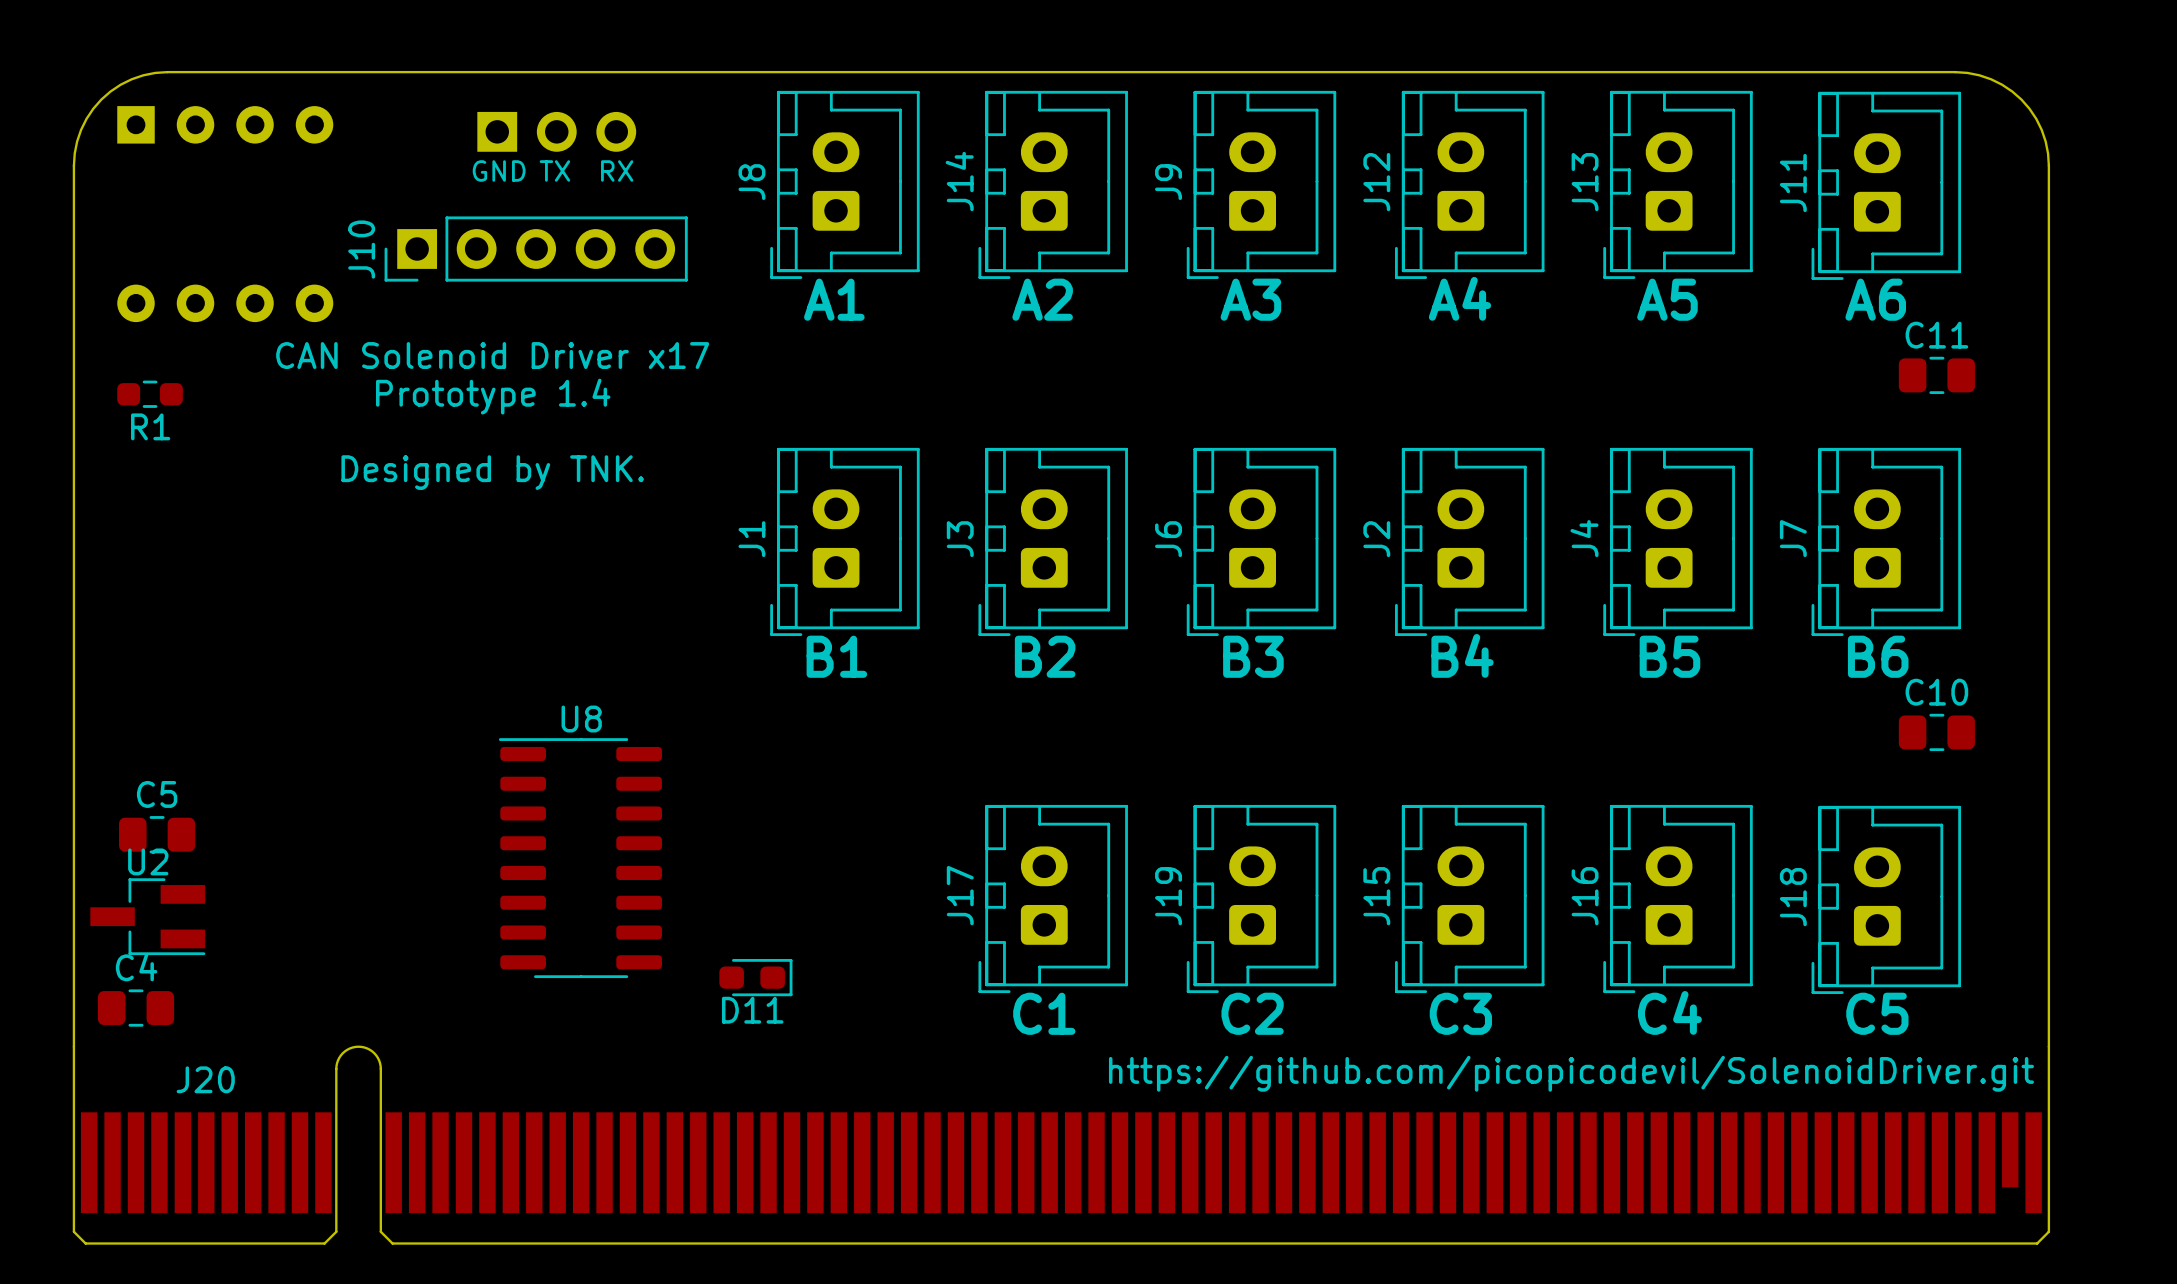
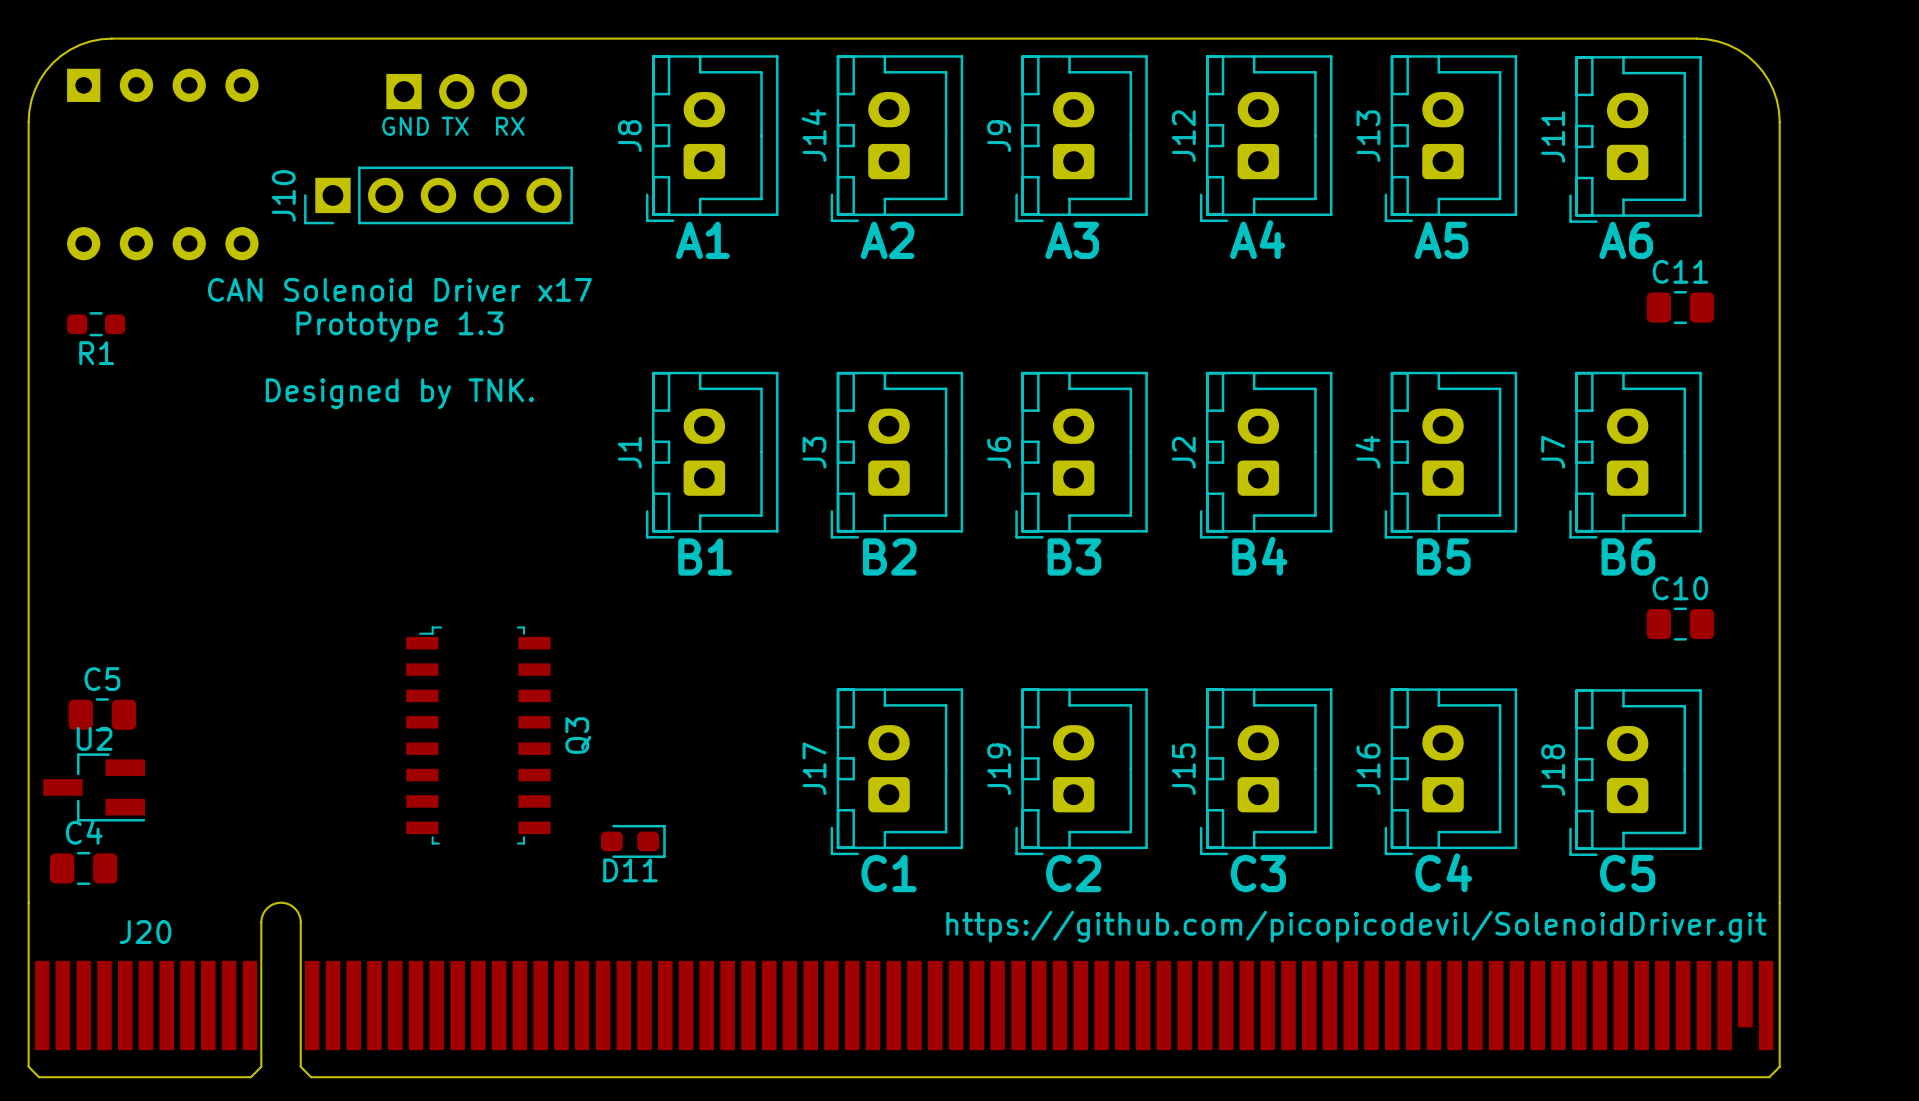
text: Prototype 1.4 (493, 396) -> Prototype 1.3 (399, 326)
U8: (580, 858) -> none
Q3: none -> (478, 735)

